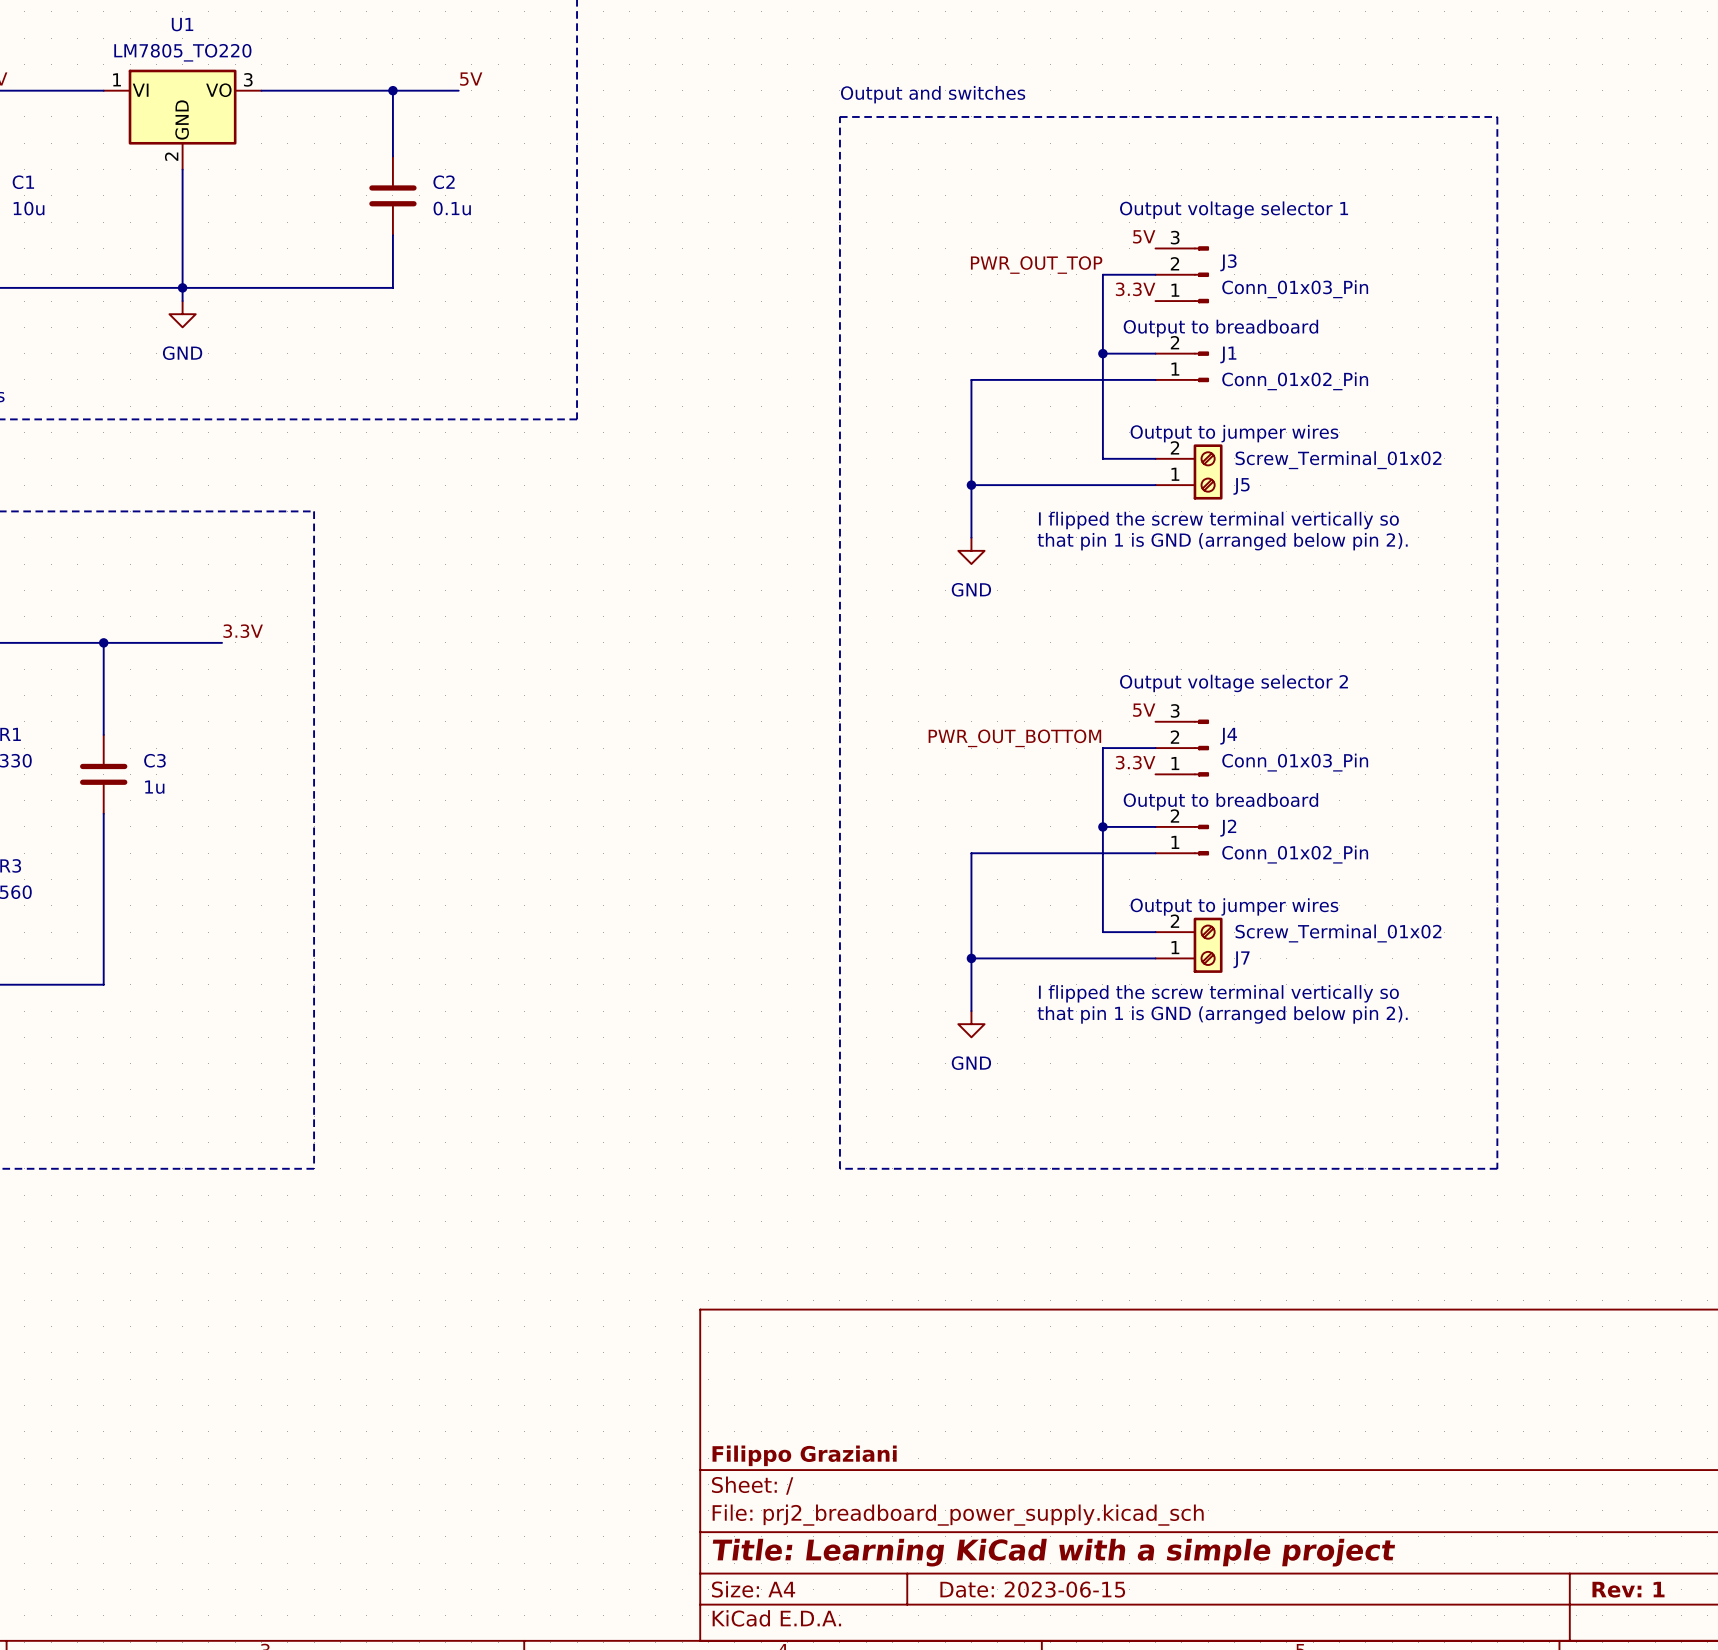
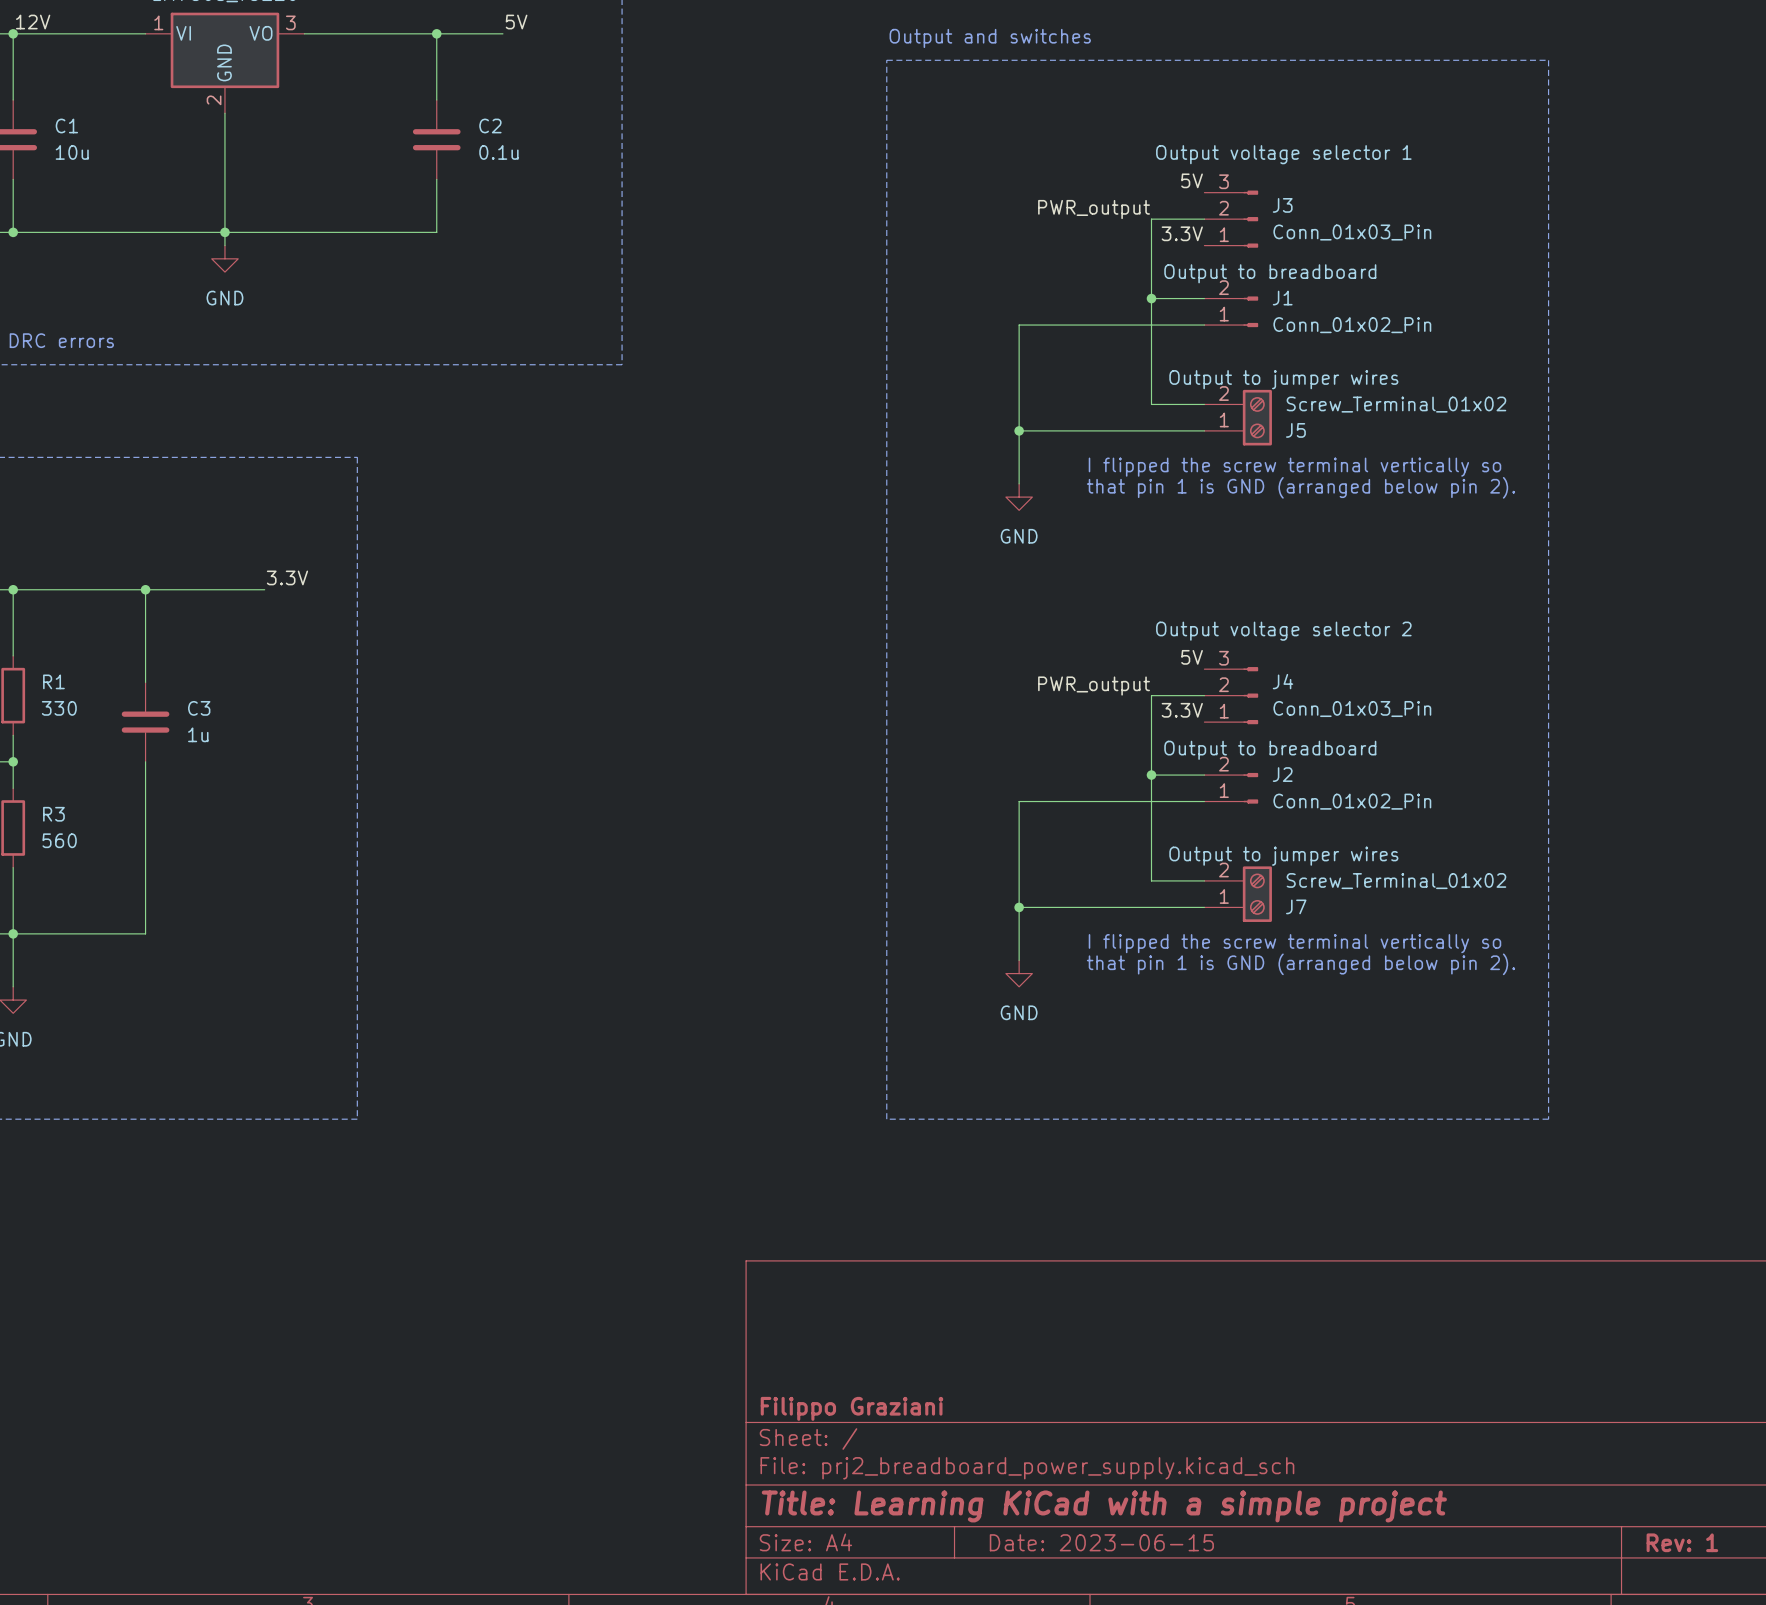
label: PWR_OUT_TOP (1036, 265) -> PWR_output (1094, 209)
label: PWR_OUT_BOTTOM (1014, 738) -> PWR_output (1094, 686)

